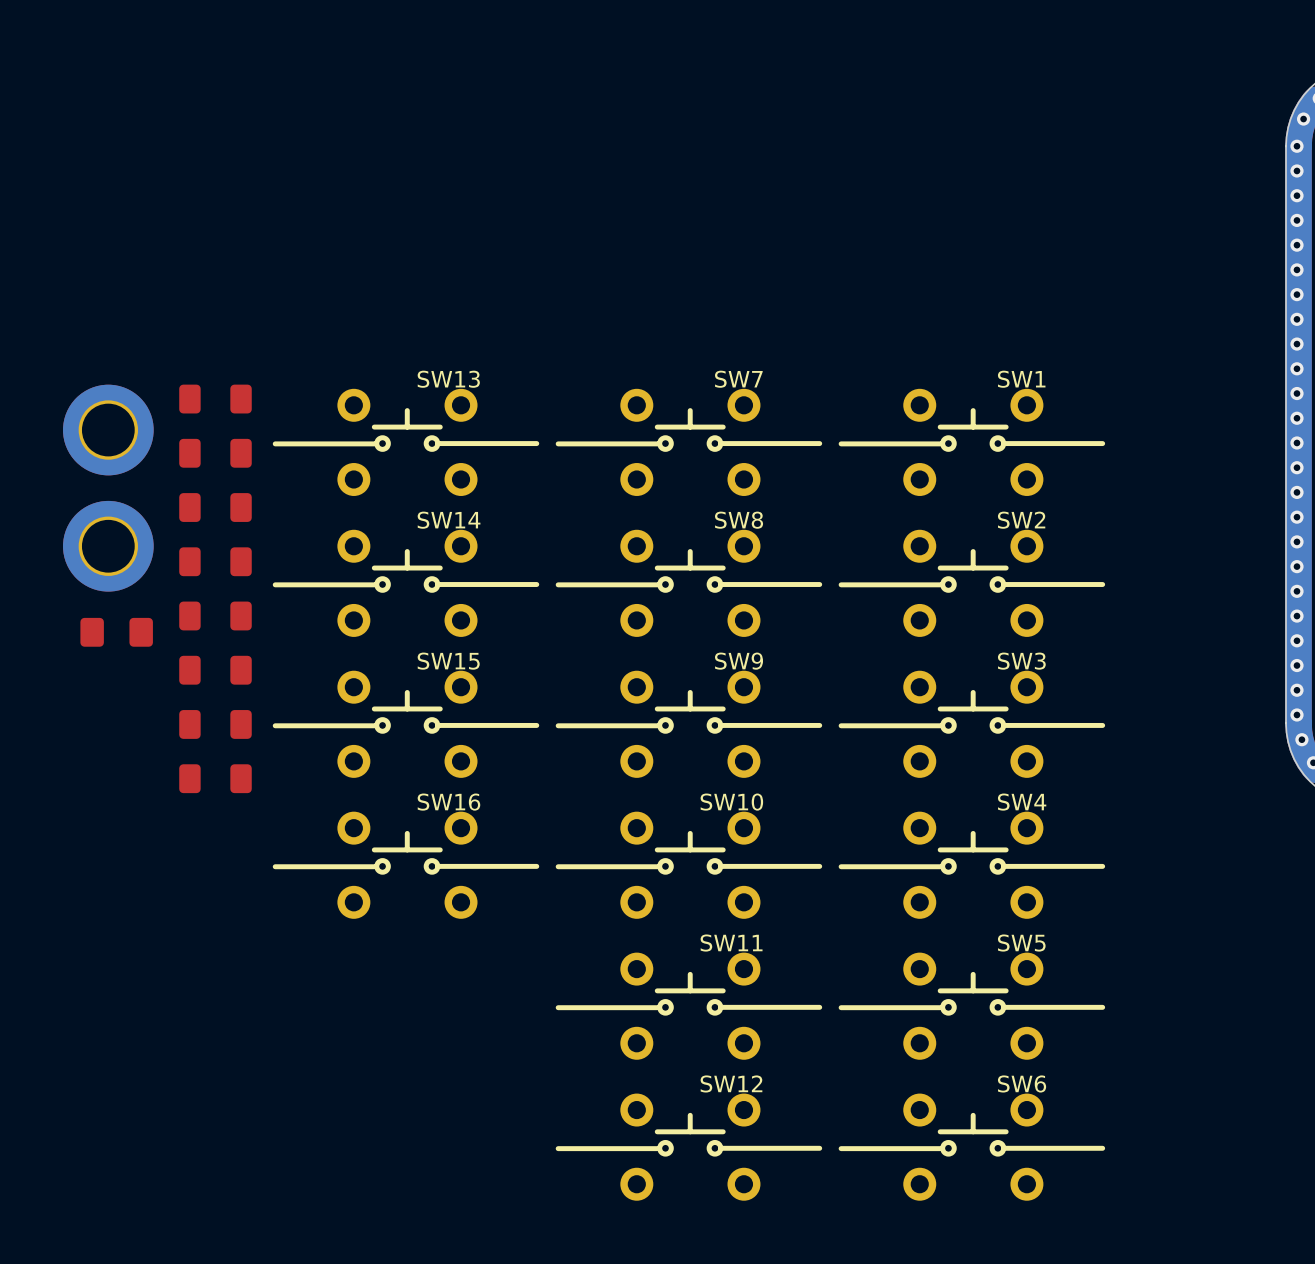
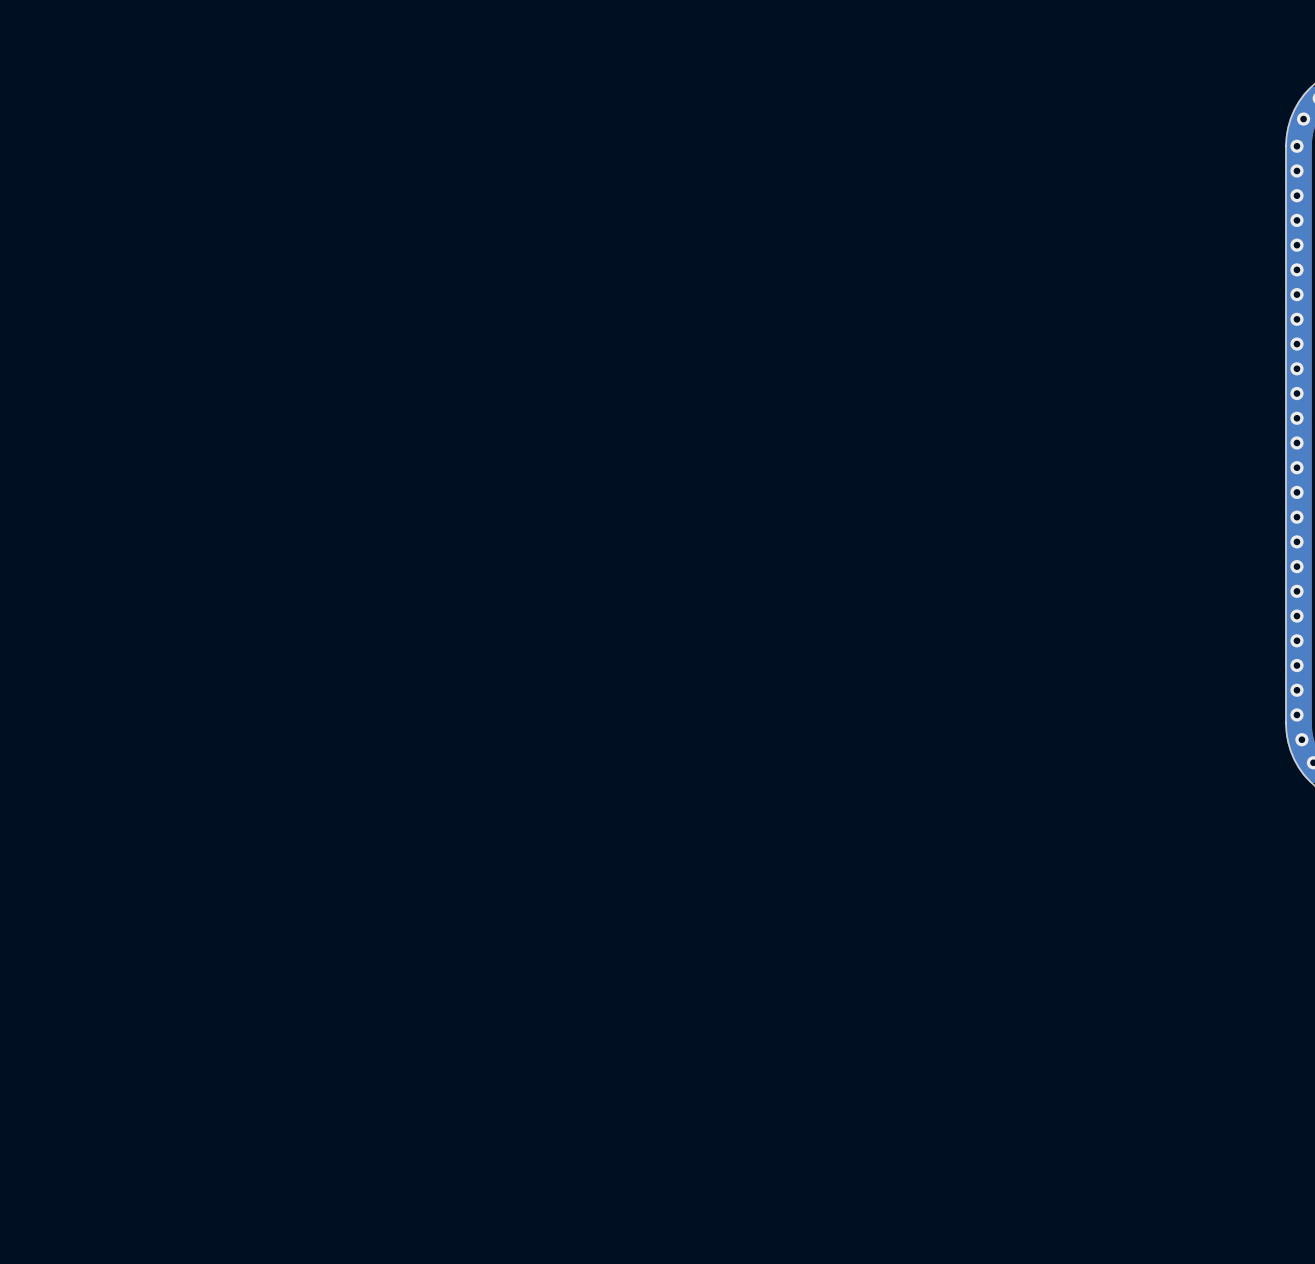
part: (215, 399) -> none
part: (108, 430) -> none
SW13: (405, 442) -> none
SW7: (688, 442) -> none
SW1: (971, 442) -> none
part: (215, 453) -> none
part: (215, 507) -> none
part: (108, 546) -> none
part: (215, 561) -> none
SW14: (405, 583) -> none
SW8: (688, 583) -> none
SW2: (971, 583) -> none
part: (215, 615) -> none
part: (116, 632) -> none
part: (215, 670) -> none
part: (215, 724) -> none
SW15: (405, 724) -> none
SW9: (688, 724) -> none
SW3: (971, 724) -> none
part: (215, 778) -> none
SW16: (405, 865) -> none
SW10: (688, 865) -> none
SW4: (971, 865) -> none
SW11: (688, 1006) -> none
SW5: (971, 1006) -> none
SW12: (688, 1147) -> none
SW6: (971, 1147) -> none

